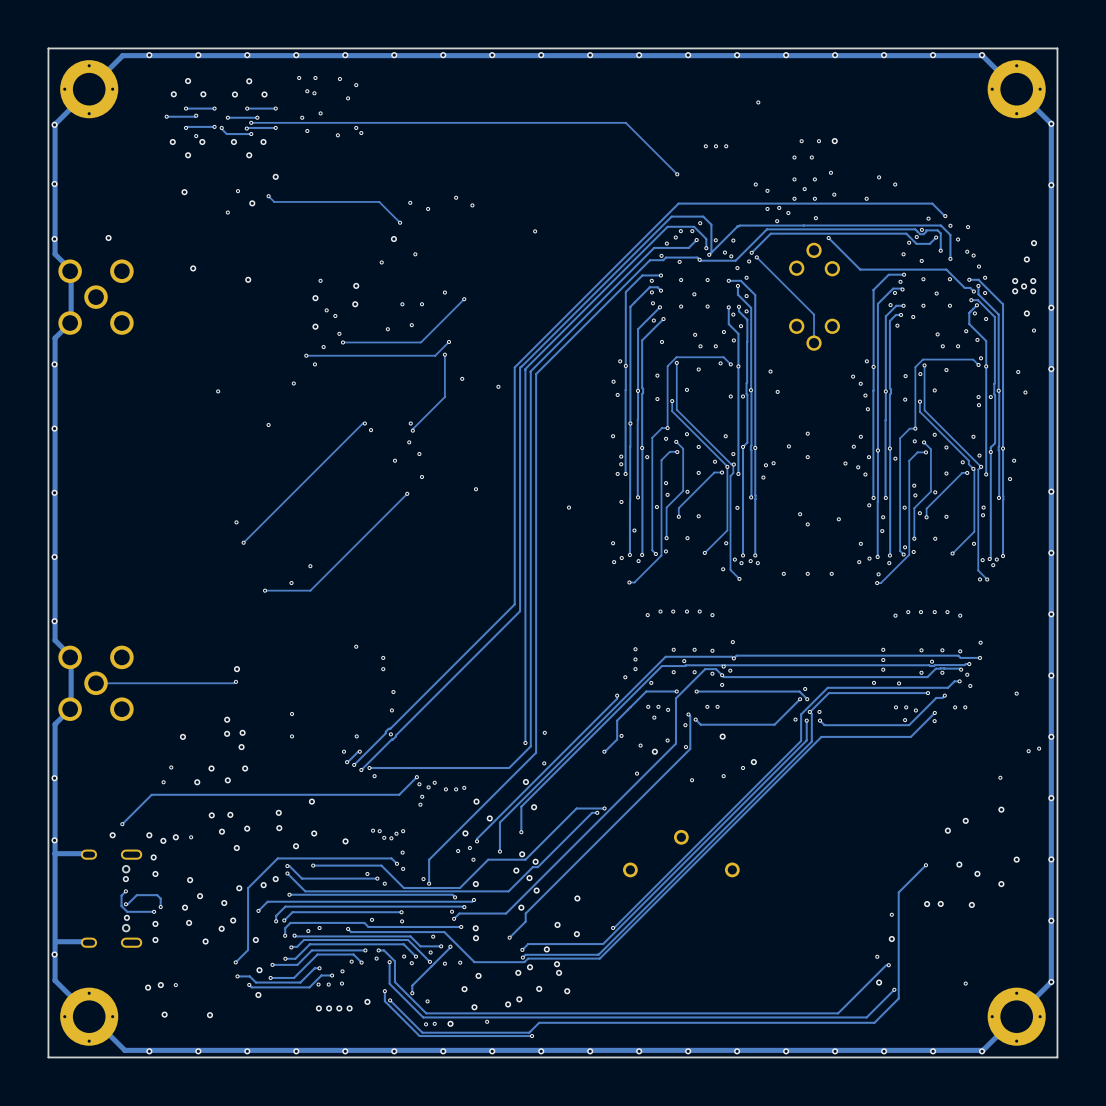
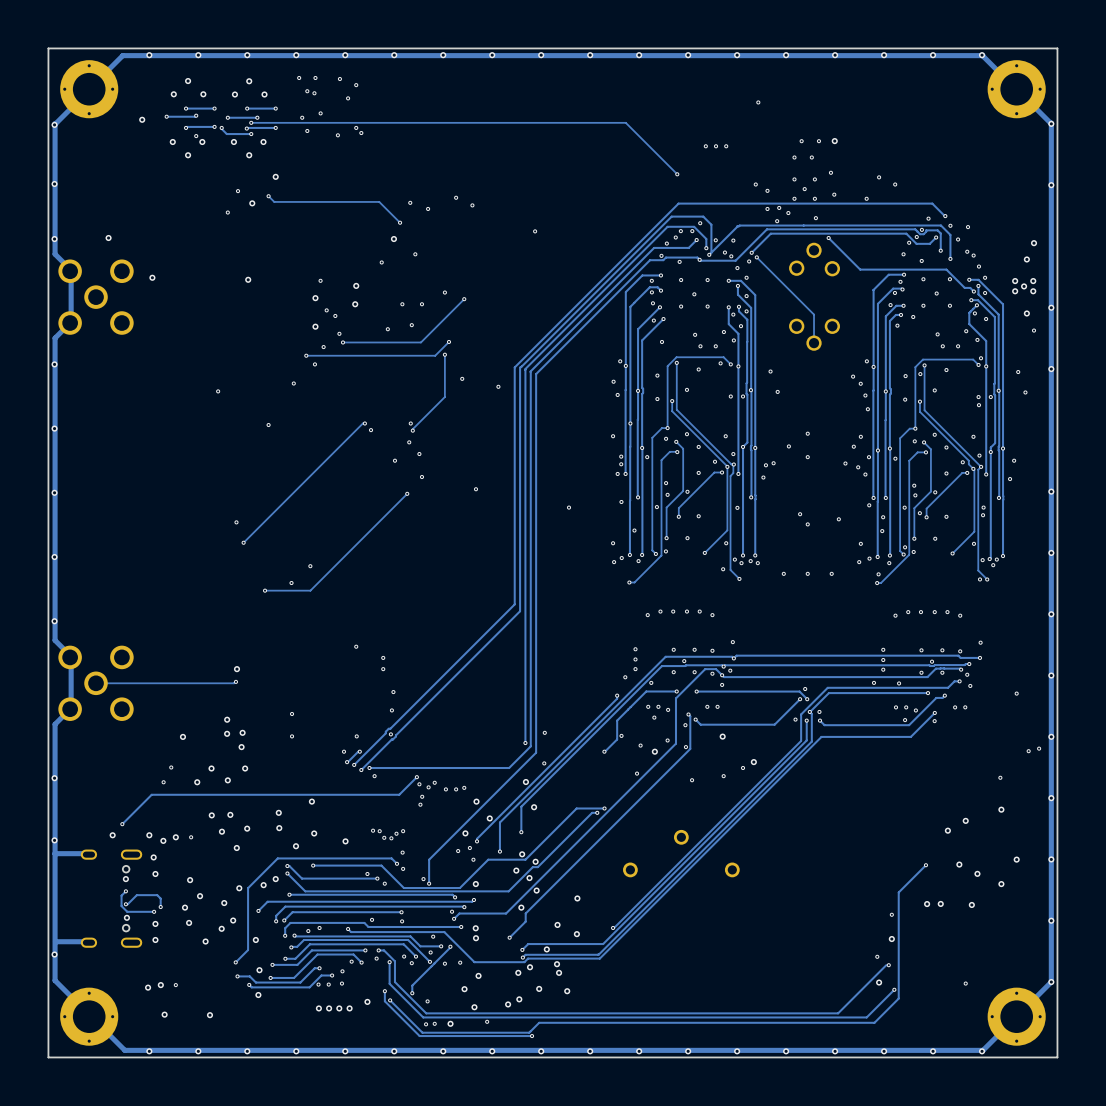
via: none -> (142, 119)
via: (184, 192) -> none
via position: (193, 268) -> (152, 277)

